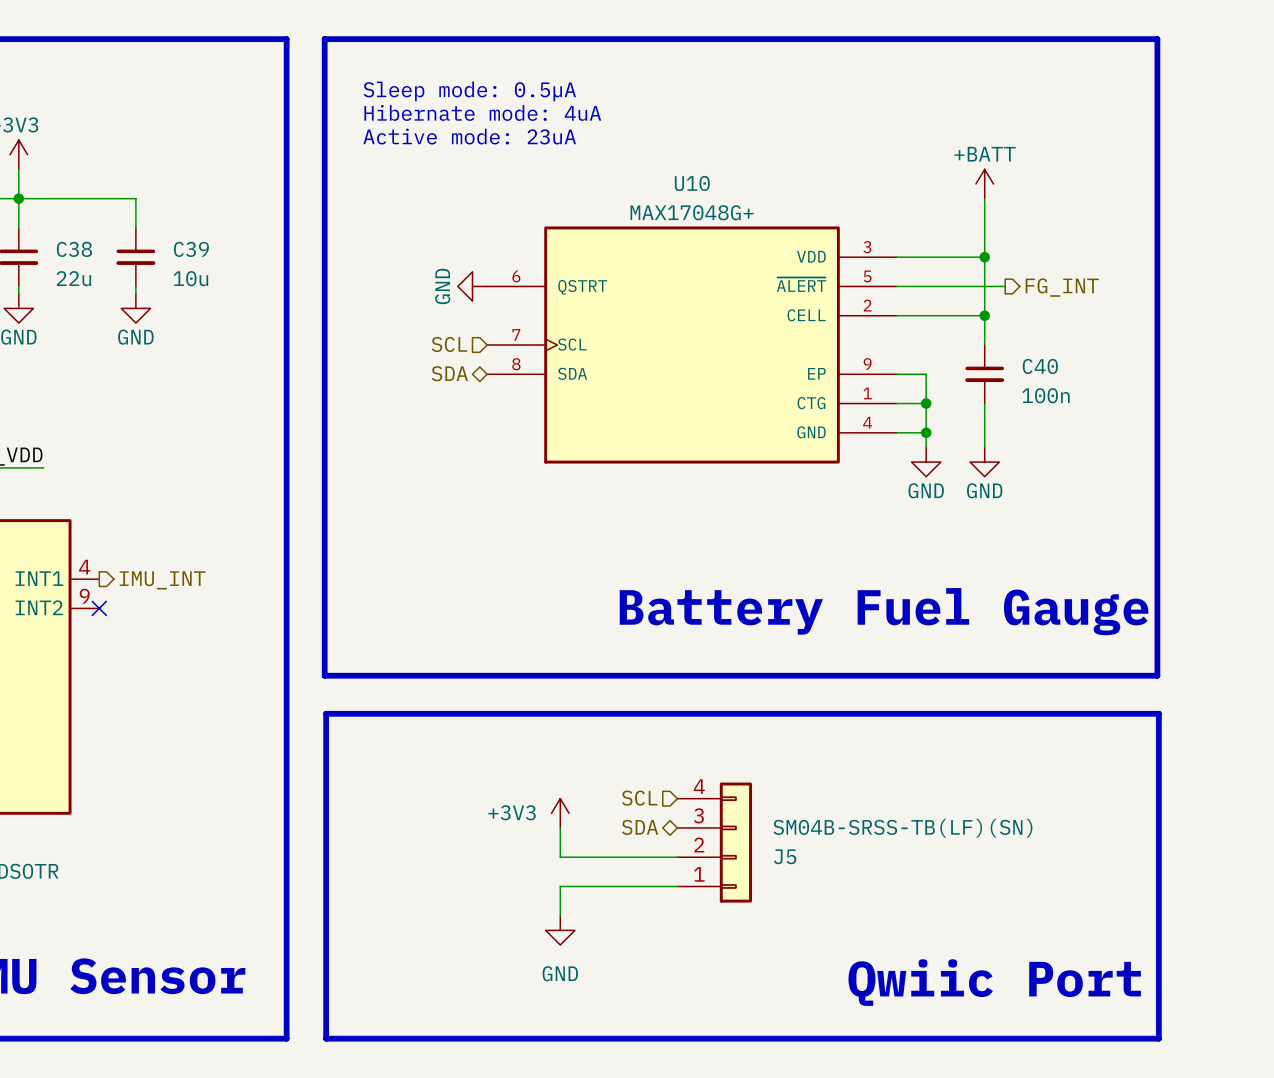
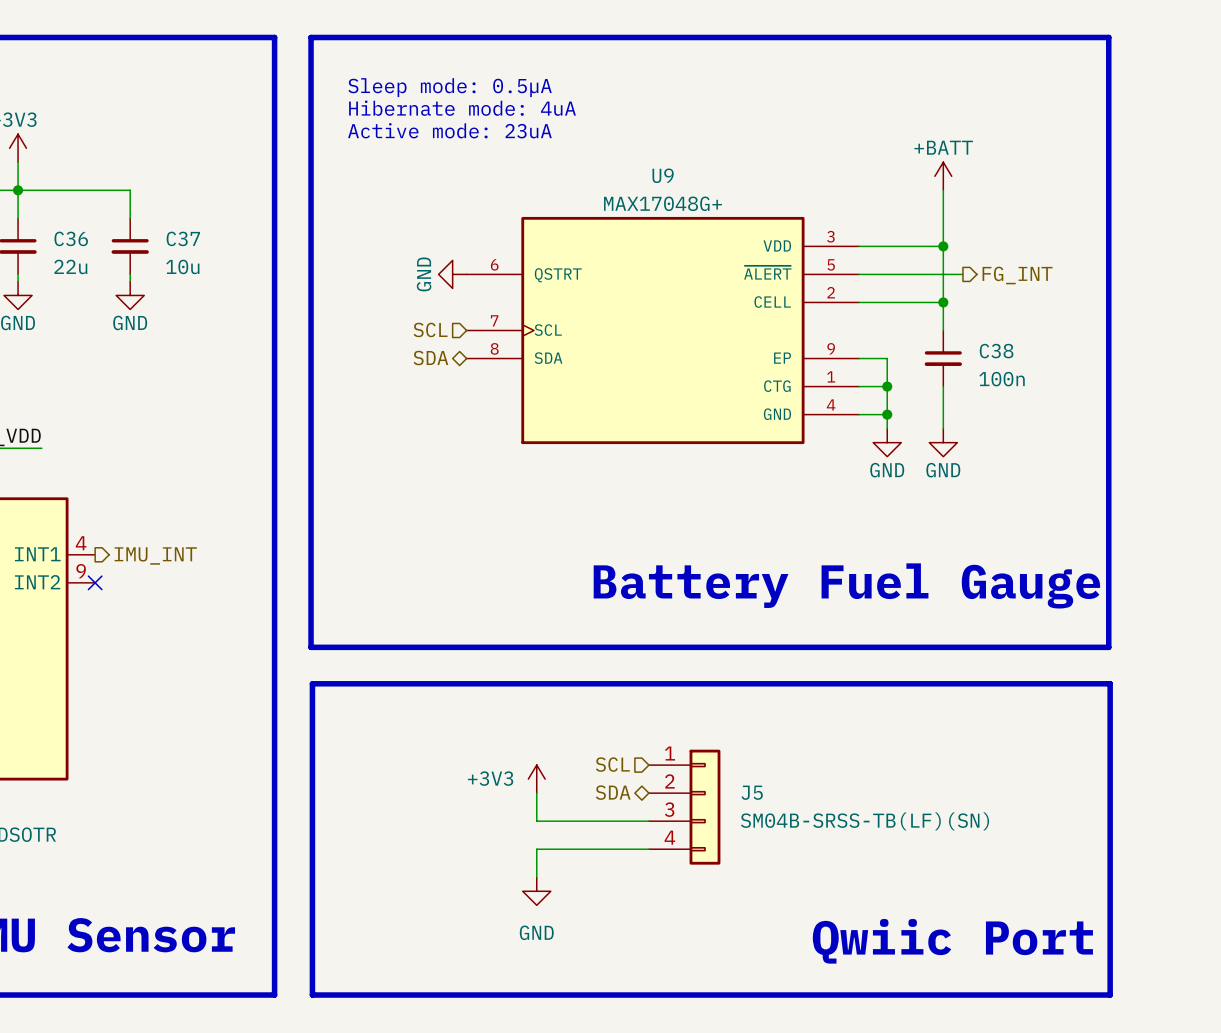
U10 name: U10 (692, 183) -> U9 (663, 175)
C38 name: C38 (74, 249) -> C36 (71, 238)
C39 name: C39 (191, 249) -> C37 (183, 238)
C40 name: C40 (1040, 366) -> C38 (996, 351)
J5 flip: as is (735, 842) -> up-down (704, 807)

